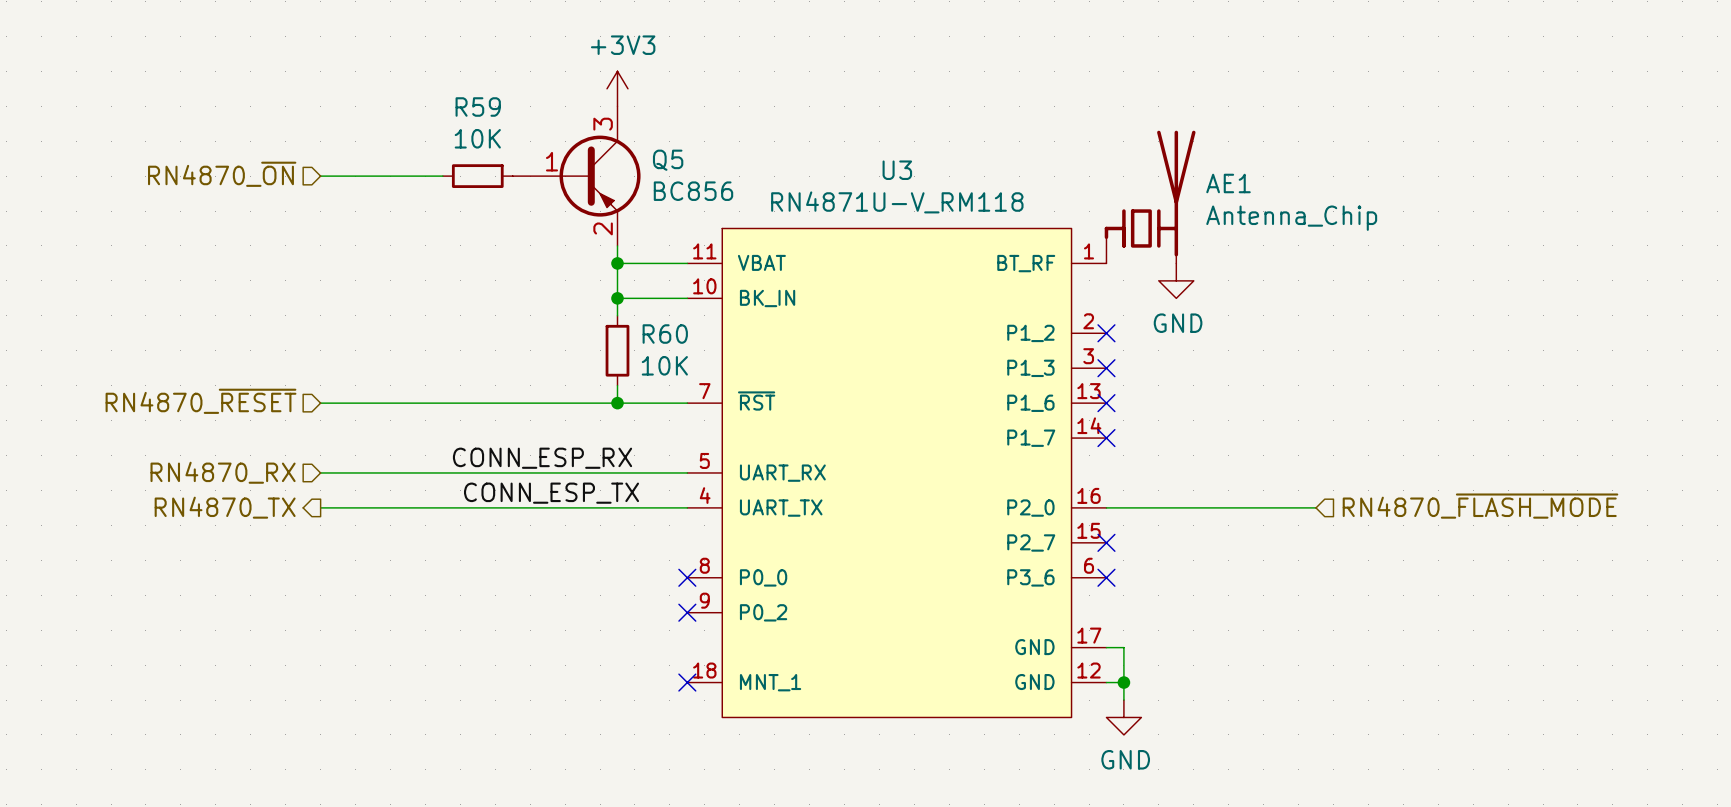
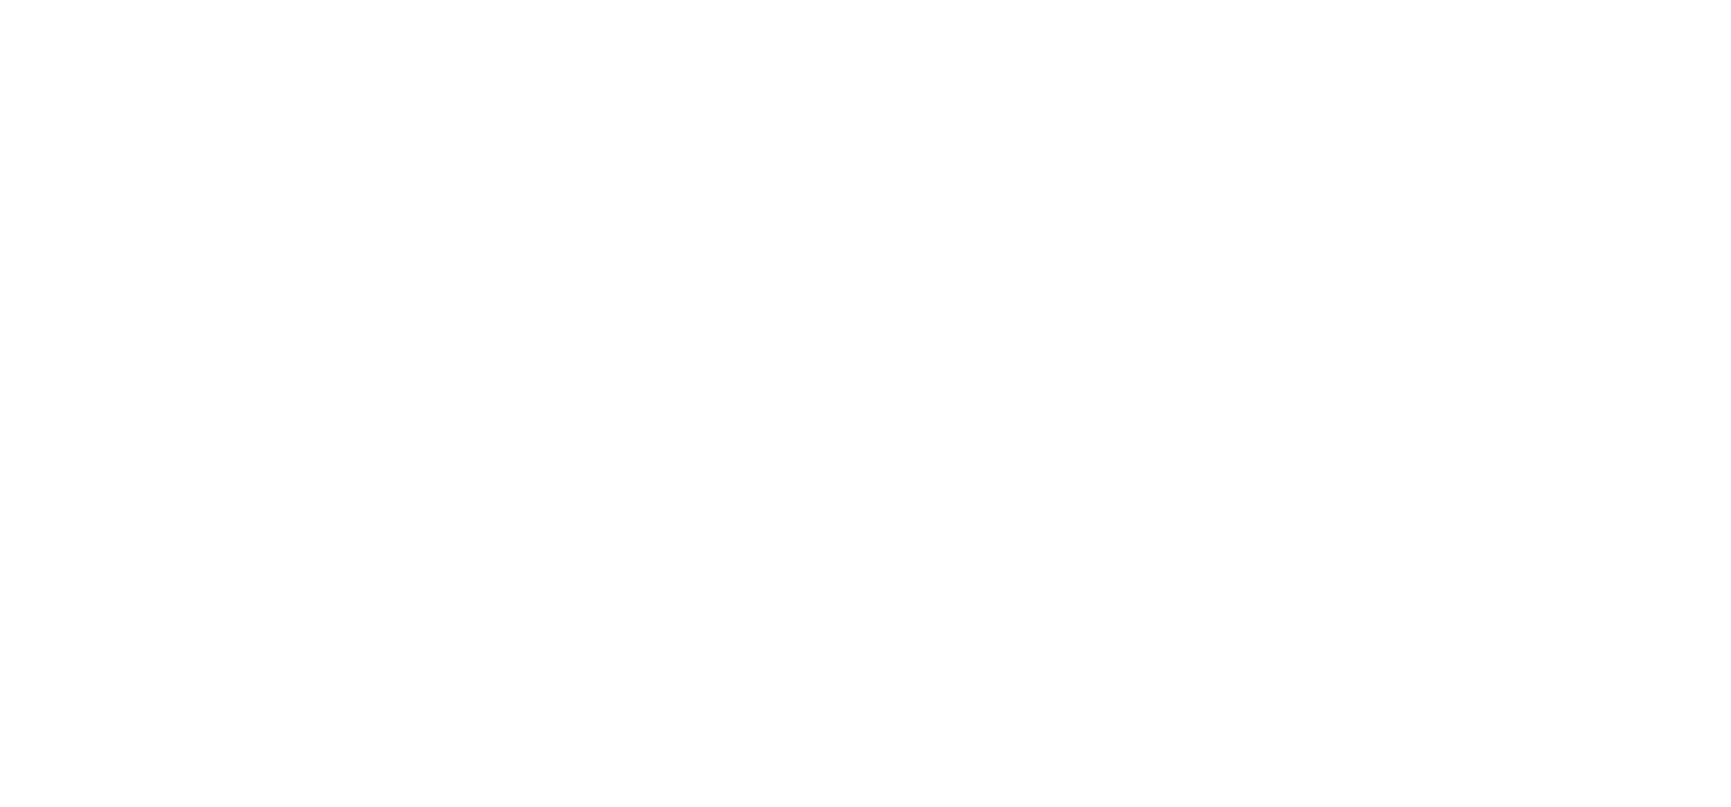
power symbol: +3V3 (617, 88) -> none
hierarchical label: RN4870_~{ON} (222, 174) -> none
wire: (320, 176) (442, 176) -> none
R59: 10K (477, 176) -> none
Q5: BC856 (576, 176) -> none
AE1: Antenna_Chip (1150, 197) -> none
wire: (617, 245) (617, 315) -> none
wire: (617, 263) (687, 263) -> none
junction: (617, 263) -> none
power symbol: GND (1176, 280) -> none
wire: (617, 298) (687, 298) -> none
junction: (617, 298) -> none
no-connect mark: (1106, 333) -> none
R60: 10K (617, 350) -> none
no-connect mark: (1106, 368) -> none
wire: (617, 385) (617, 403) -> none
hierarchical label: RN4870_~{RESET} (201, 401) -> none
wire: (320, 403) (687, 403) -> none
junction: (617, 403) -> none
no-connect mark: (1106, 403) -> none
no-connect mark: (1106, 438) -> none
label: CONN_ESP_RX (542, 458) -> none
hierarchical label: RN4870_RX (223, 472) -> none
wire: (320, 472) (687, 472) -> none
U3: RN4871U-V_RM118 (896, 472) -> none
label: CONN_ESP_TX (551, 493) -> none
hierarchical label: RN4870_~{FLASH_MODE} (1480, 506) -> none
hierarchical label: RN4870_TX (225, 507) -> none
wire: (320, 507) (687, 507) -> none
wire: (1106, 507) (1316, 507) -> none
no-connect mark: (1106, 542) -> none
no-connect mark: (687, 577) -> none
no-connect mark: (1106, 577) -> none
no-connect mark: (687, 612) -> none
wire: (1106, 647) (1123, 647) (1123, 700) -> none
no-connect mark: (687, 682) -> none
wire: (1106, 682) (1123, 682) -> none
junction: (1123, 682) -> none
power symbol: GND (1123, 717) -> none

